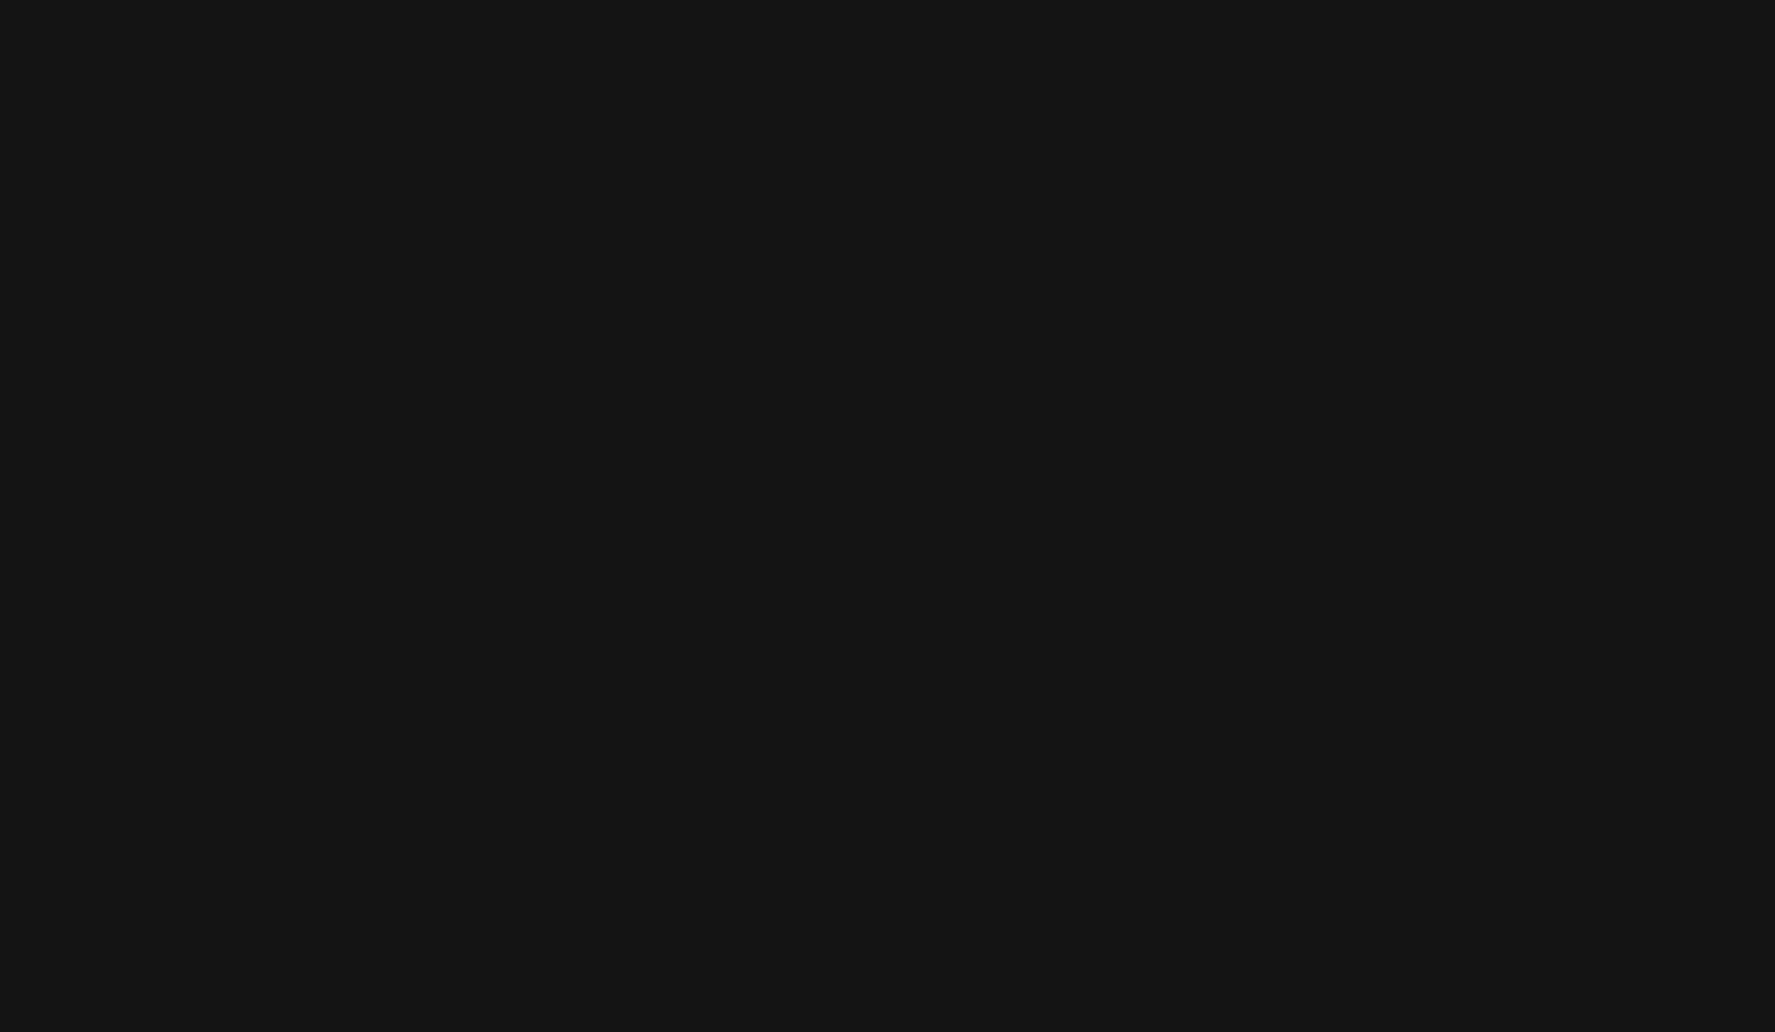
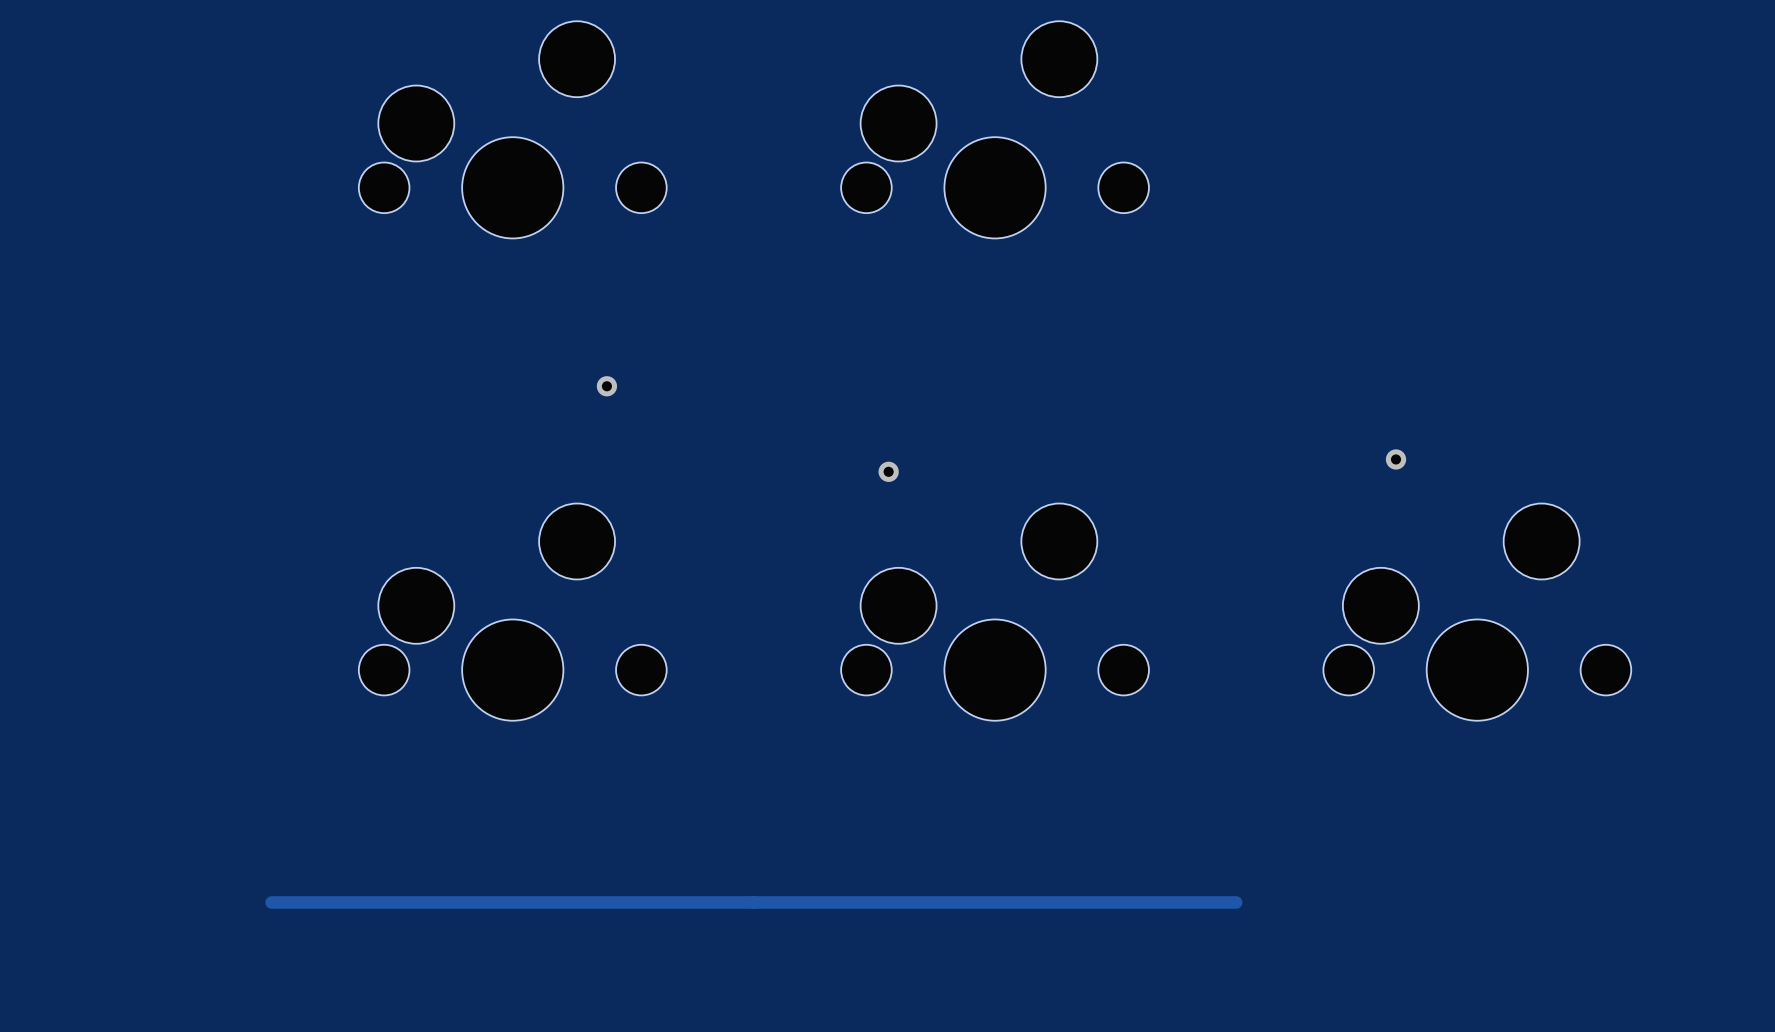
part: none -> (512, 129)
part: none -> (995, 129)
via: none -> (606, 386)
via: none -> (1396, 459)
via: none -> (888, 471)
part: none -> (512, 612)
part: none -> (995, 612)
part: none -> (1477, 612)
track: none -> (271, 902) (1236, 902)

